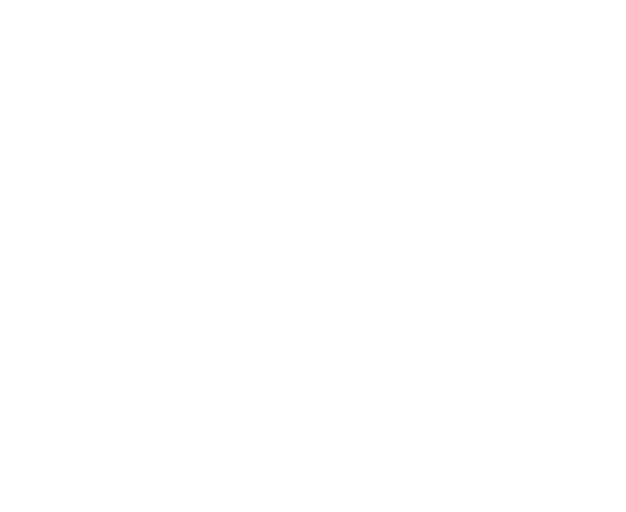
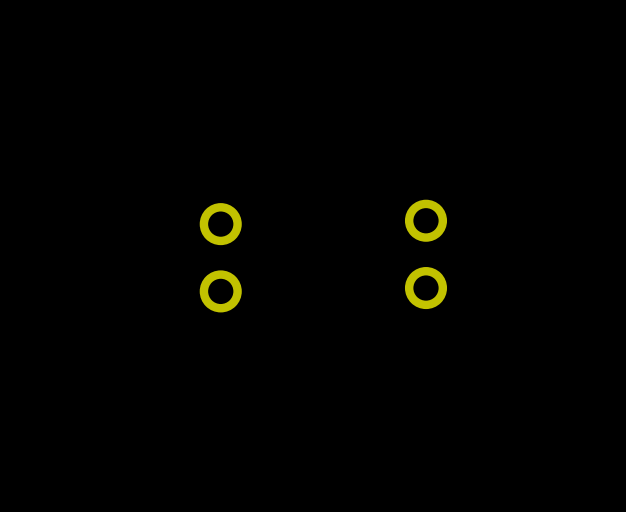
part: none -> (425, 254)
part: none -> (220, 257)

